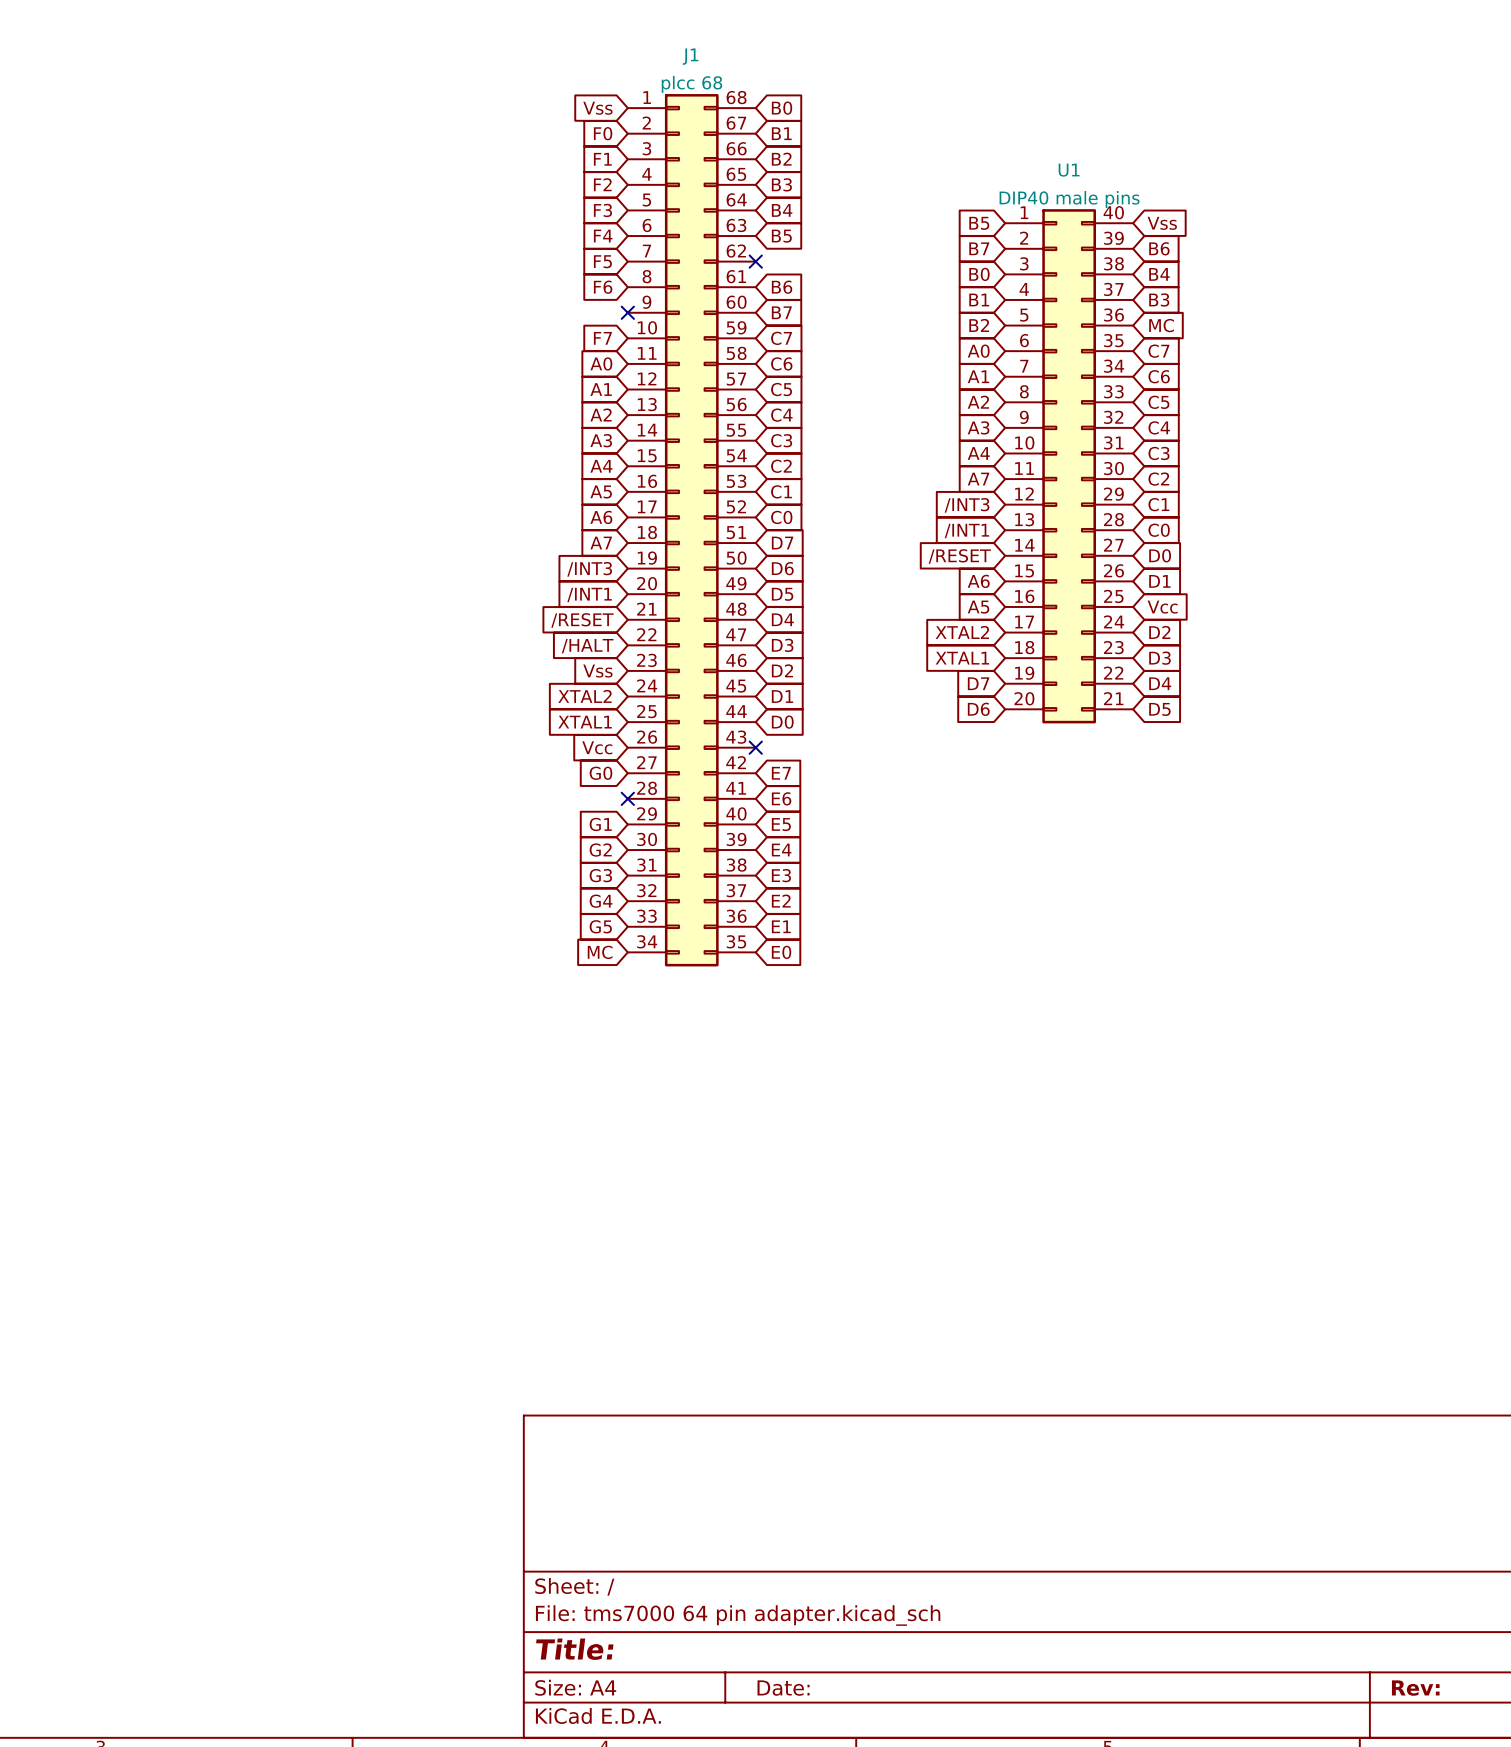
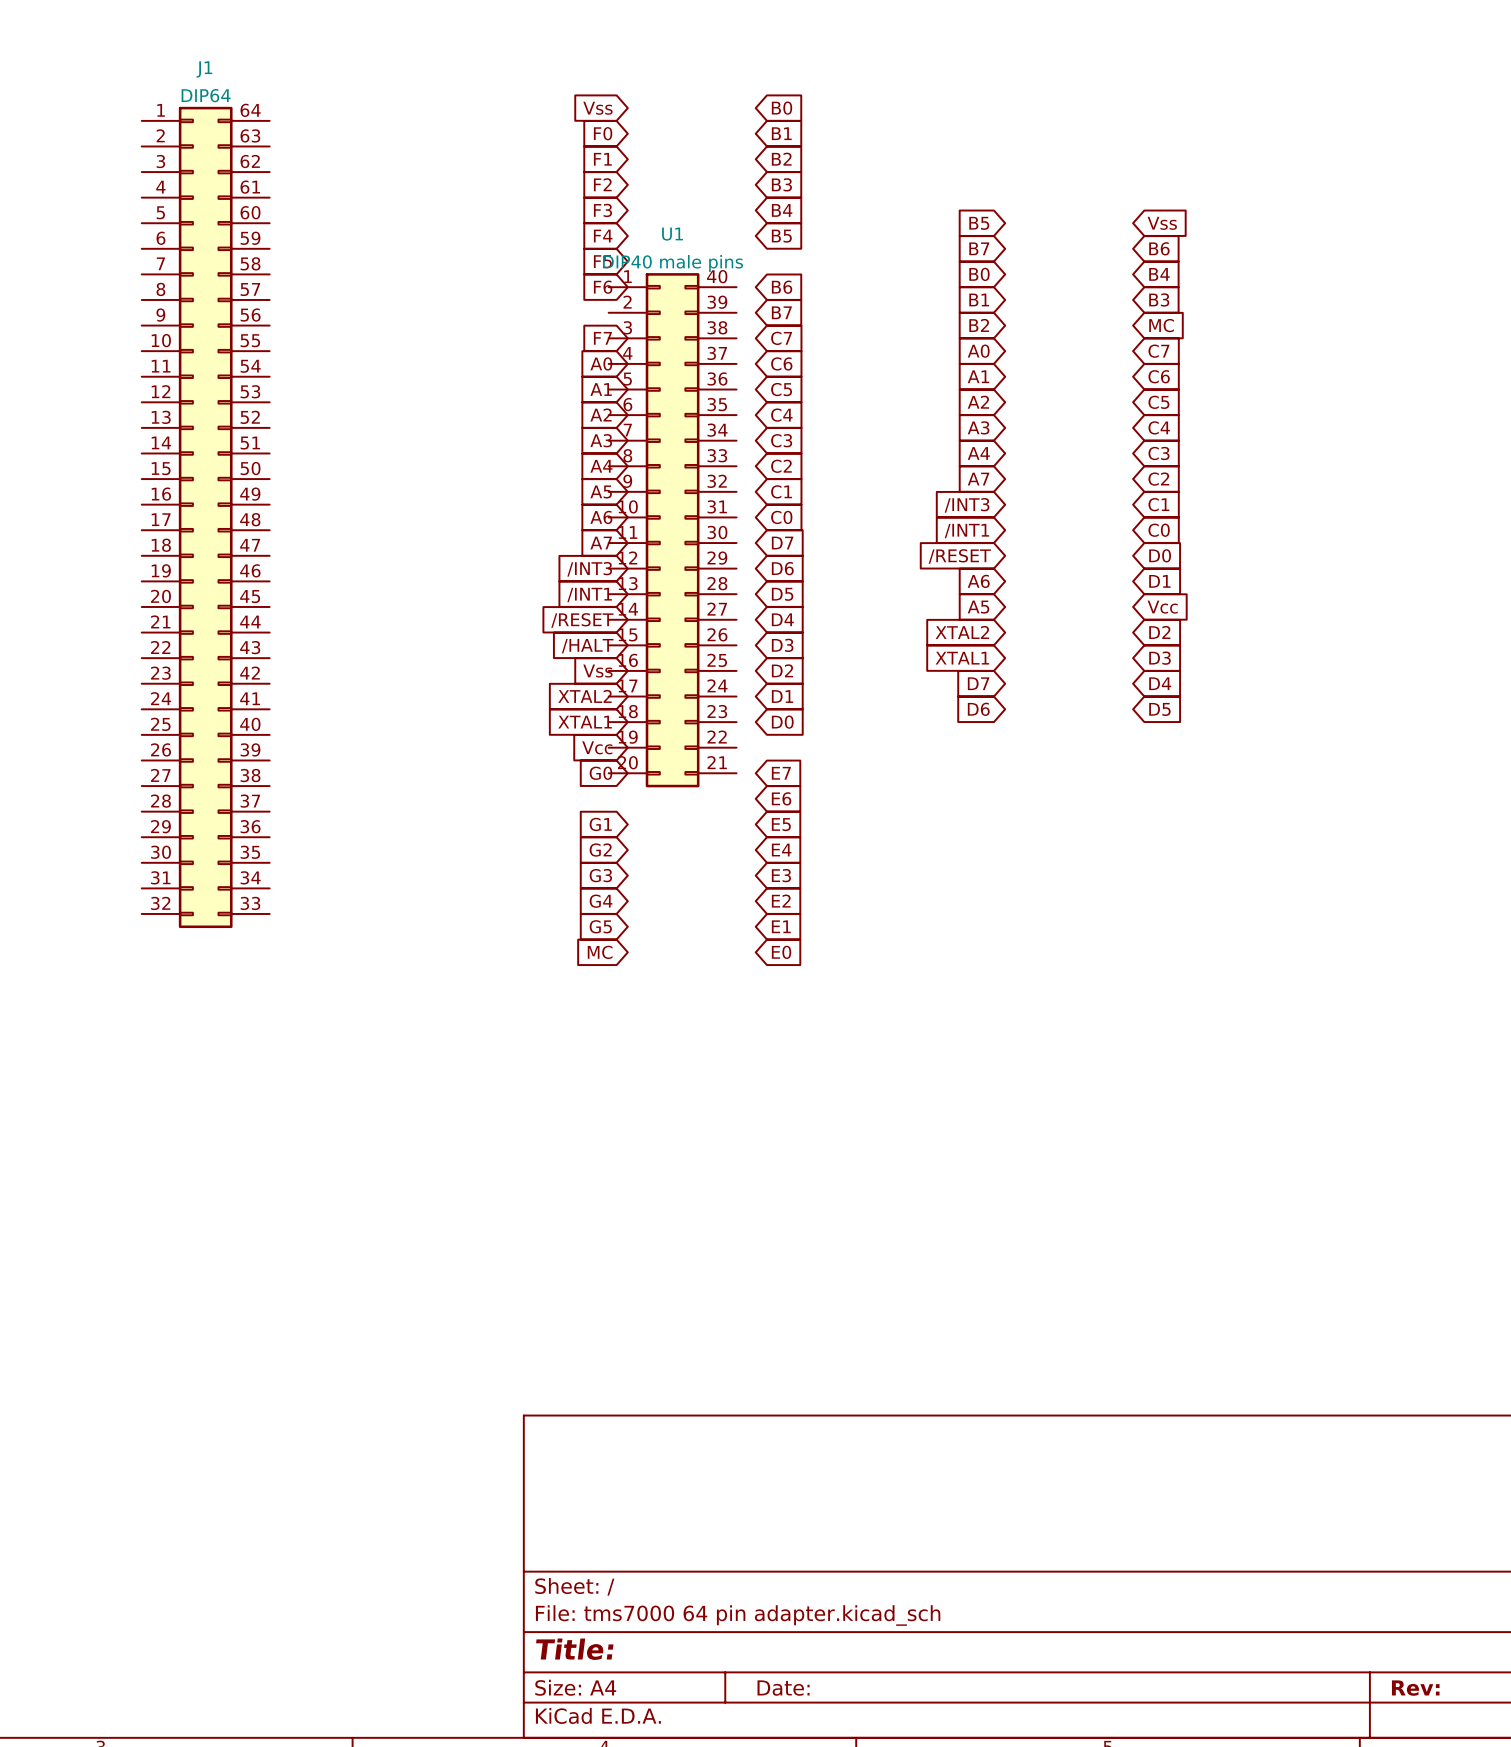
J1 name position: J1 (690, 56) -> J1 (204, 69)
J1 value: plcc 68 (691, 84) -> DIP64 (206, 95)
J1 symbol: [627, 94, 756, 967] -> [141, 106, 270, 929]
no-connect mark: (755, 261) -> none
no-connect mark: (627, 312) -> none
U1 position: (1069, 466) -> (672, 530)
no-connect mark: (755, 747) -> none
no-connect mark: (627, 798) -> none

